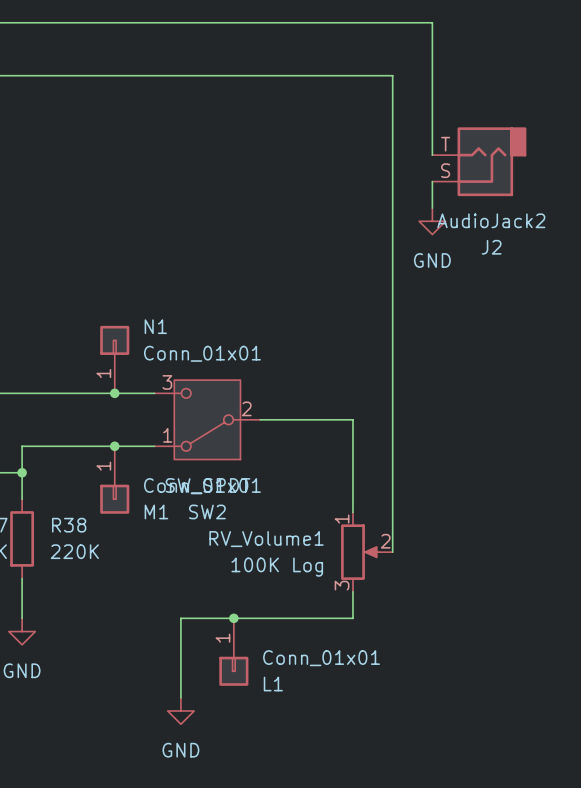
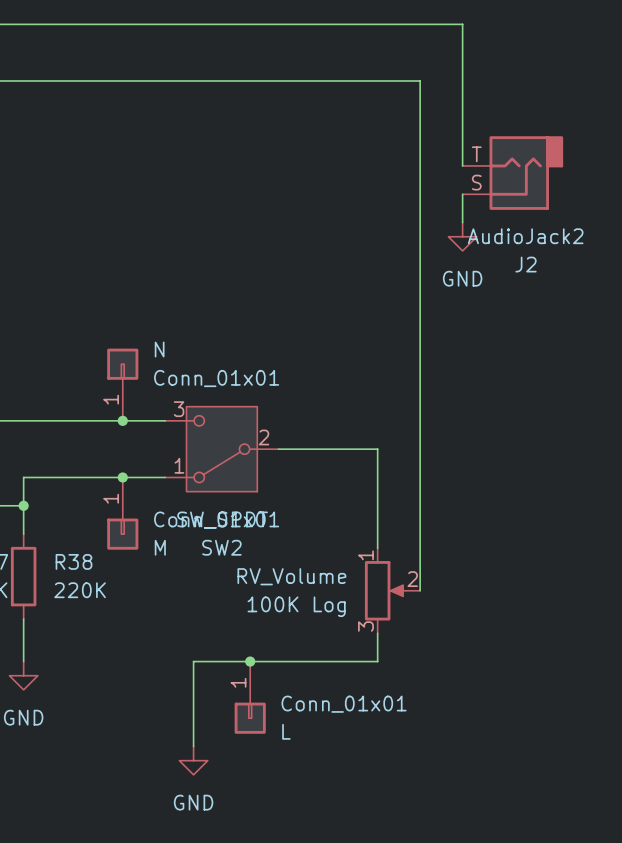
N1 name: N1 (155, 326) -> N (159, 349)
M1 name: M1 (156, 511) -> M (160, 547)
RV_Volume1 name: RV_Volume1 (266, 539) -> RV_Volume (291, 576)
L1 name: L1 (273, 684) -> L (286, 731)

